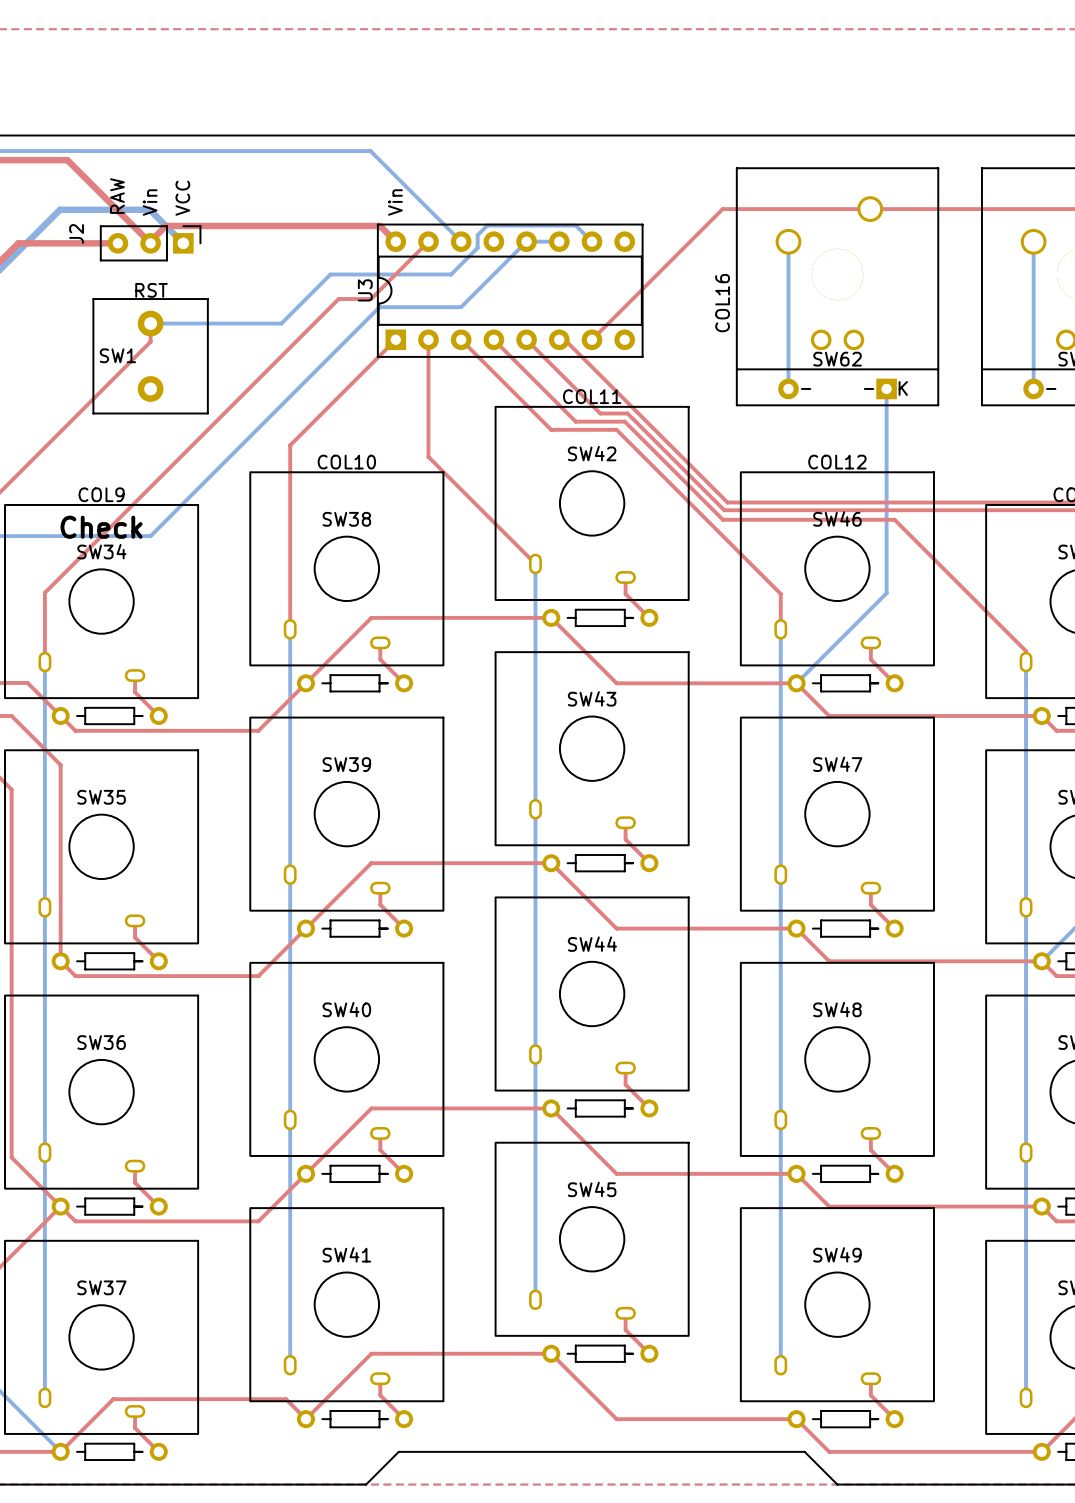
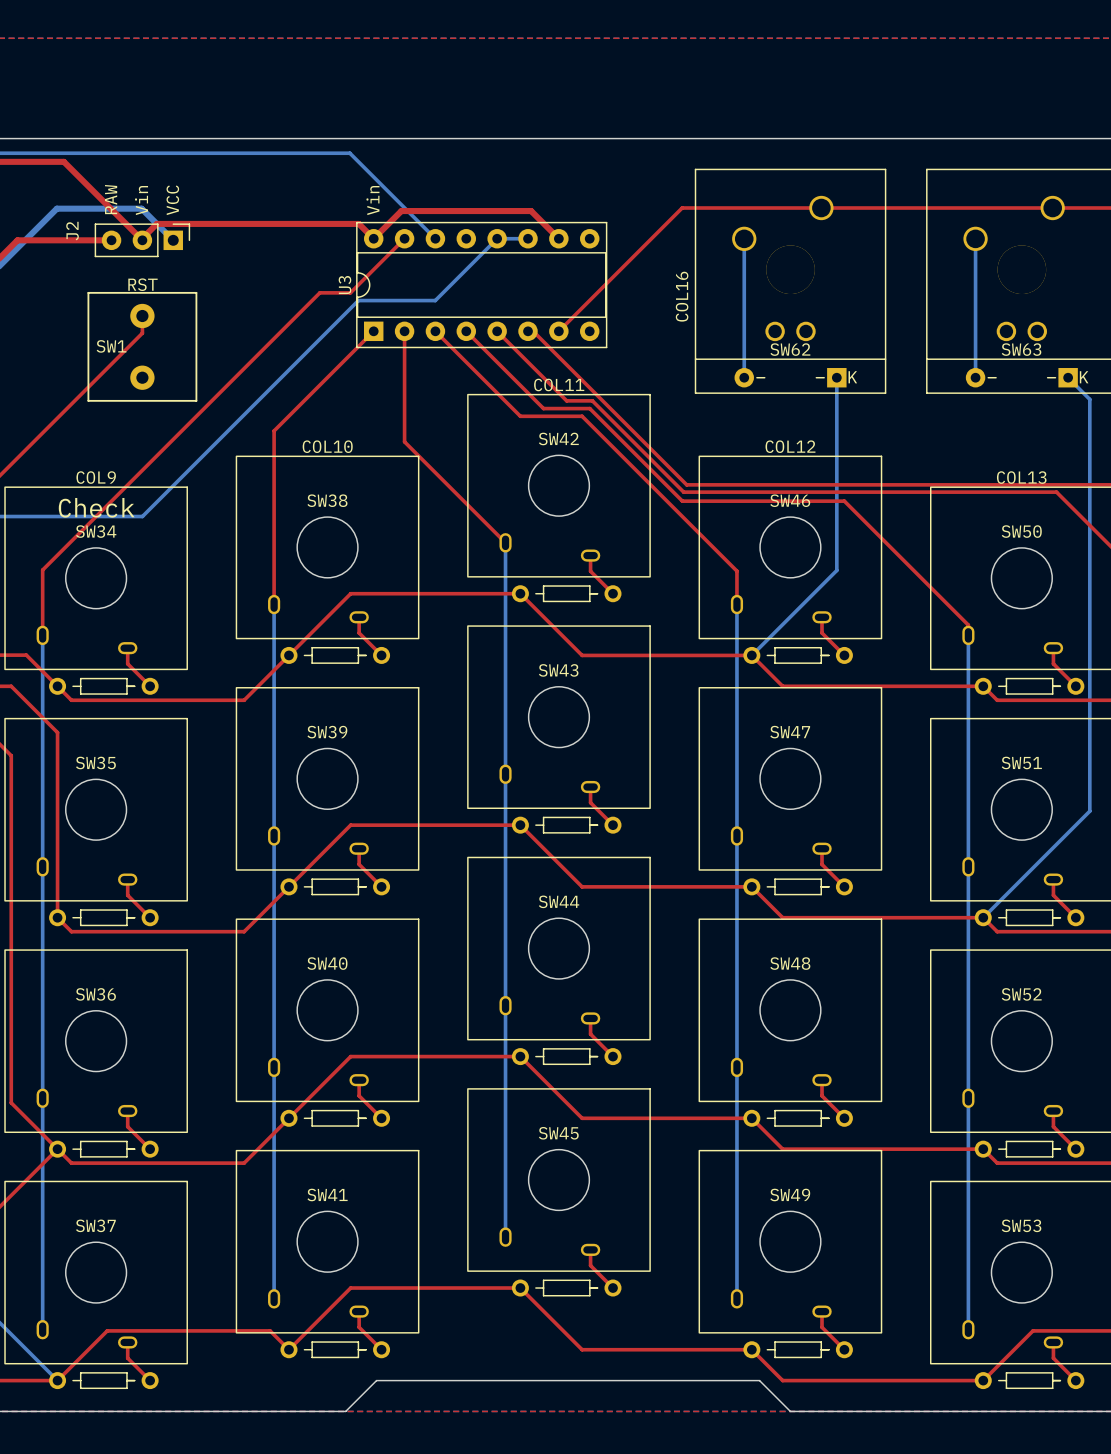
top track: none -> (373, 238) (401, 211) (531, 211) (558, 238)
bottom track: (592, 241) (575, 225) (487, 225) (477, 235) (477, 247) (451, 274) (330, 274) (281, 323) (150, 323) -> none

